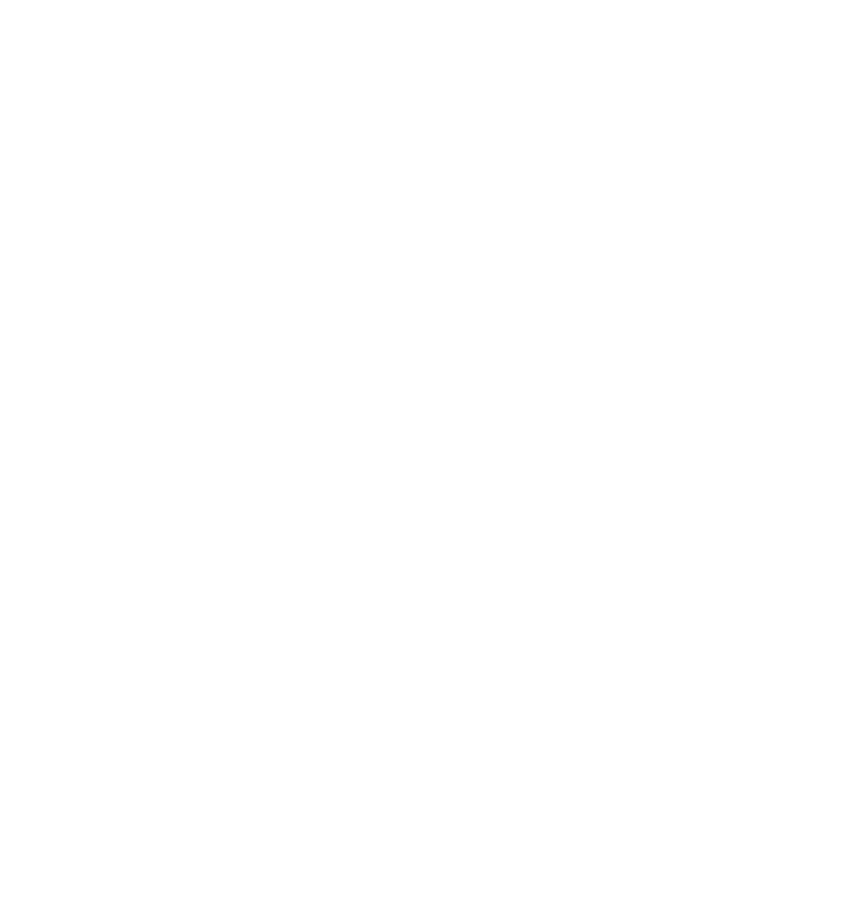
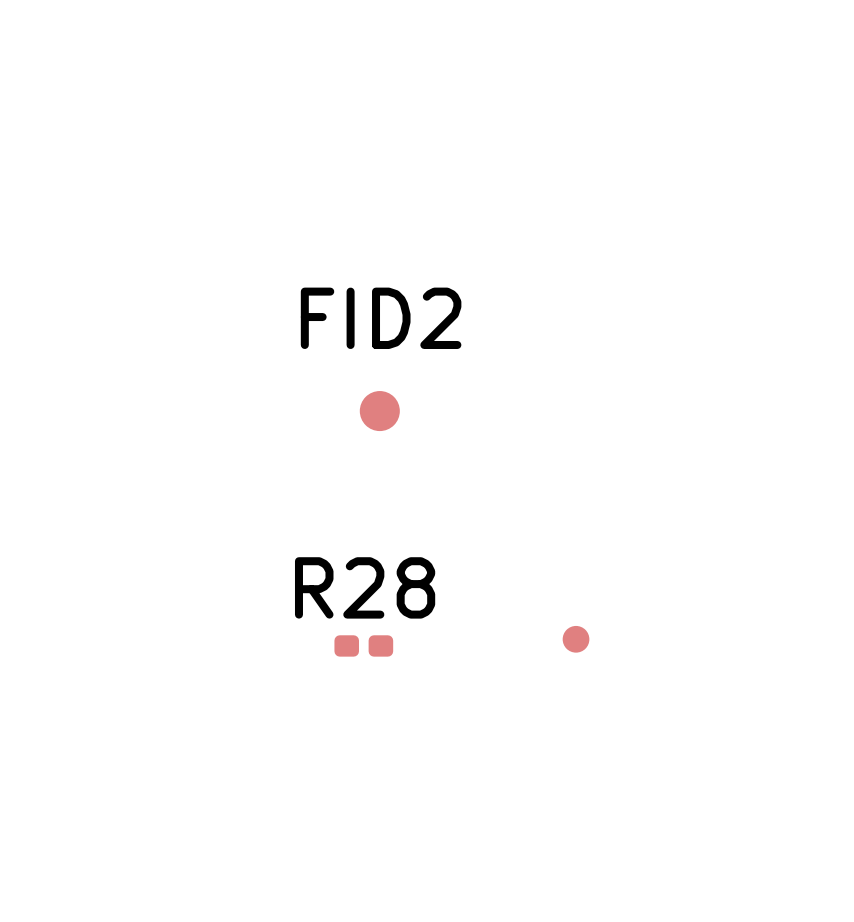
FID2: none -> (379, 411)
part: none -> (576, 639)
R28: none -> (363, 645)

